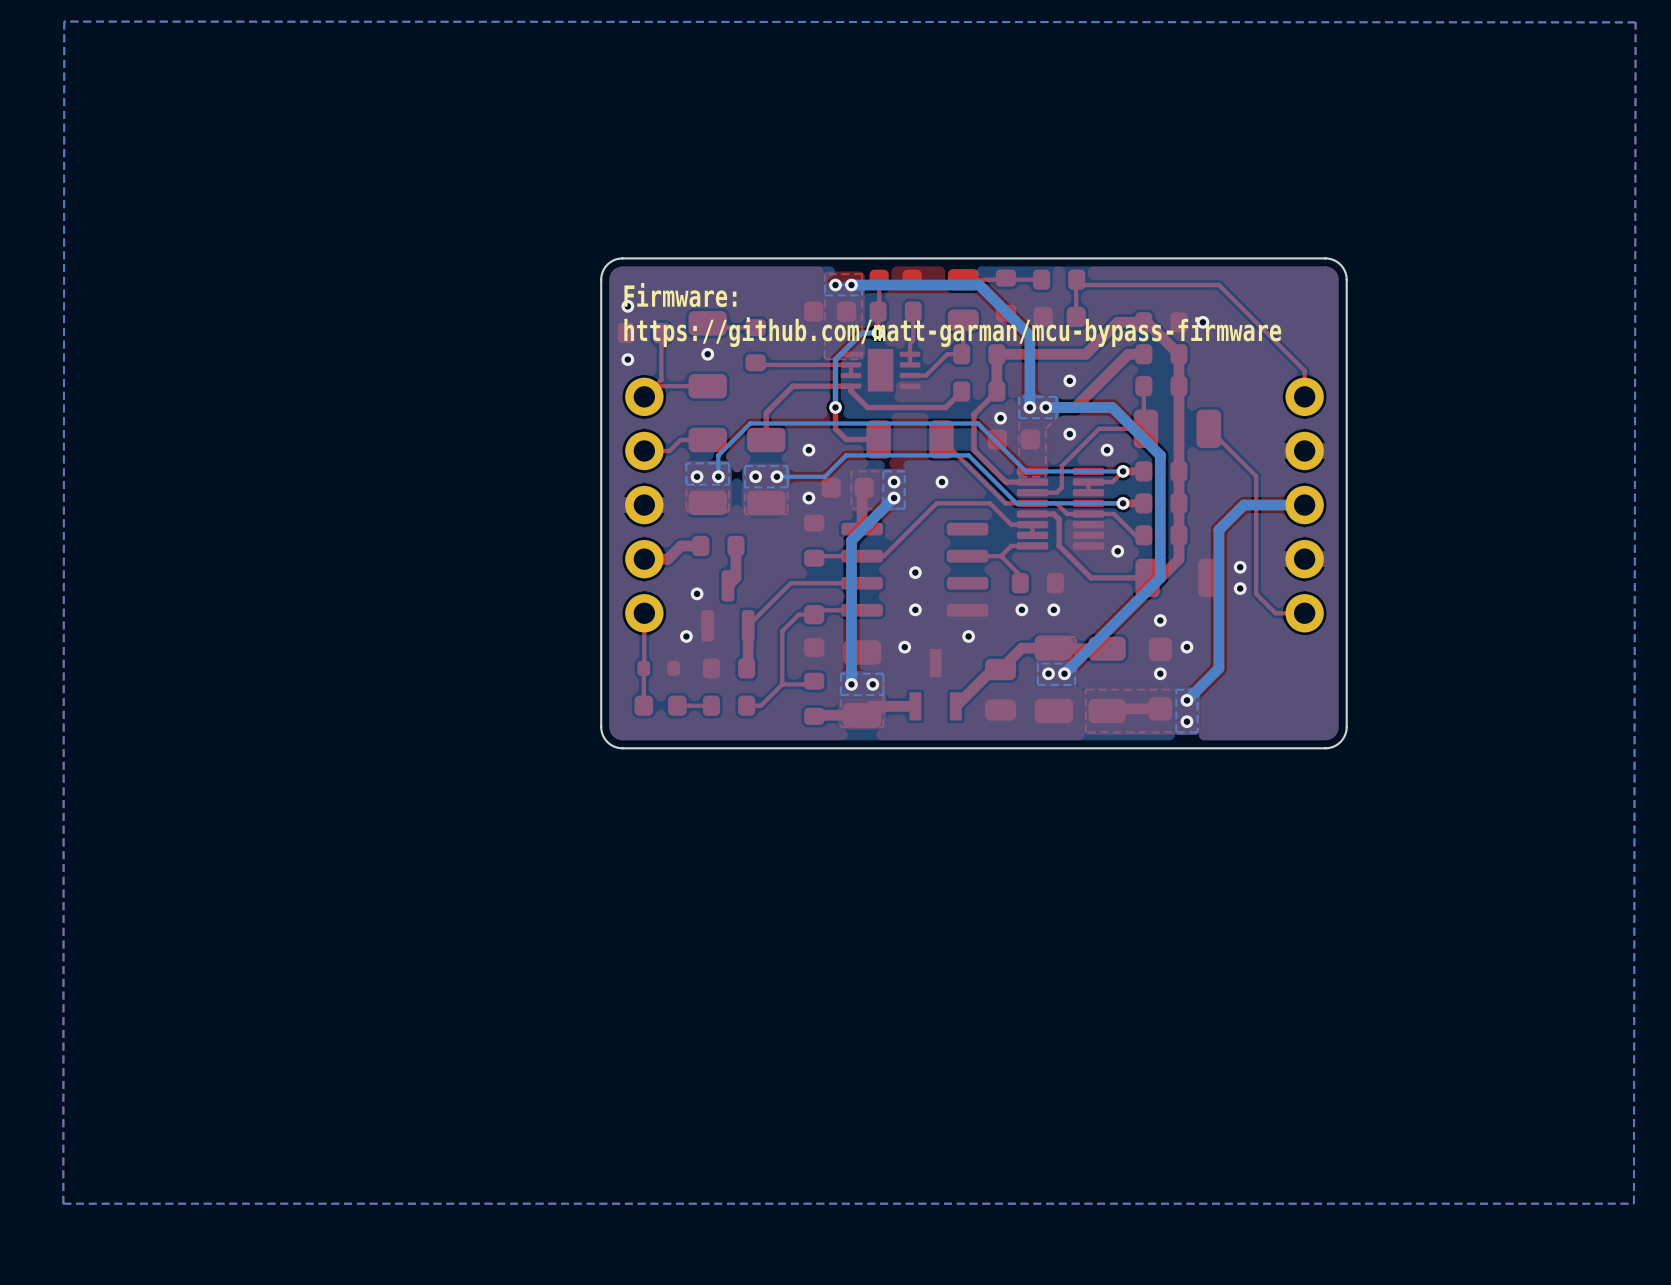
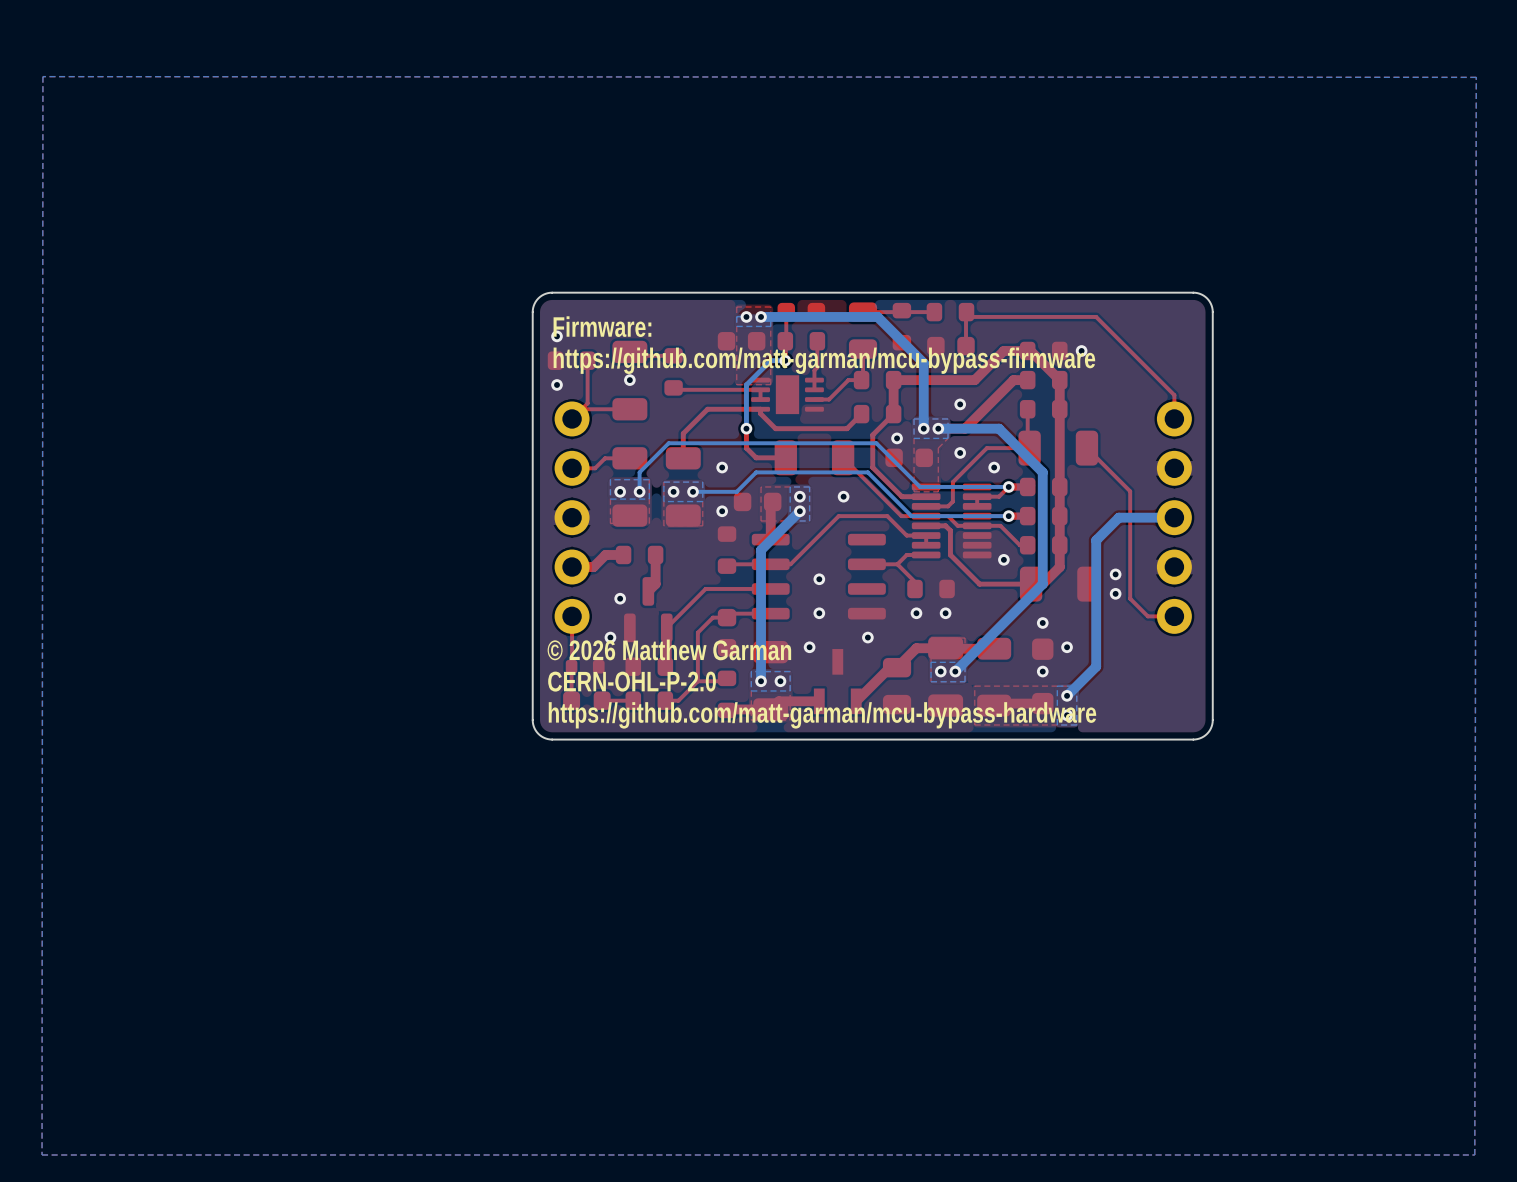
text: none -> © 2026 Matthew Garman (669, 649)
text: none -> CERN-OHL-P-2.0 (632, 681)
text: none -> https://github.com/matt-garman/mcu-bypass-hardware (822, 715)

